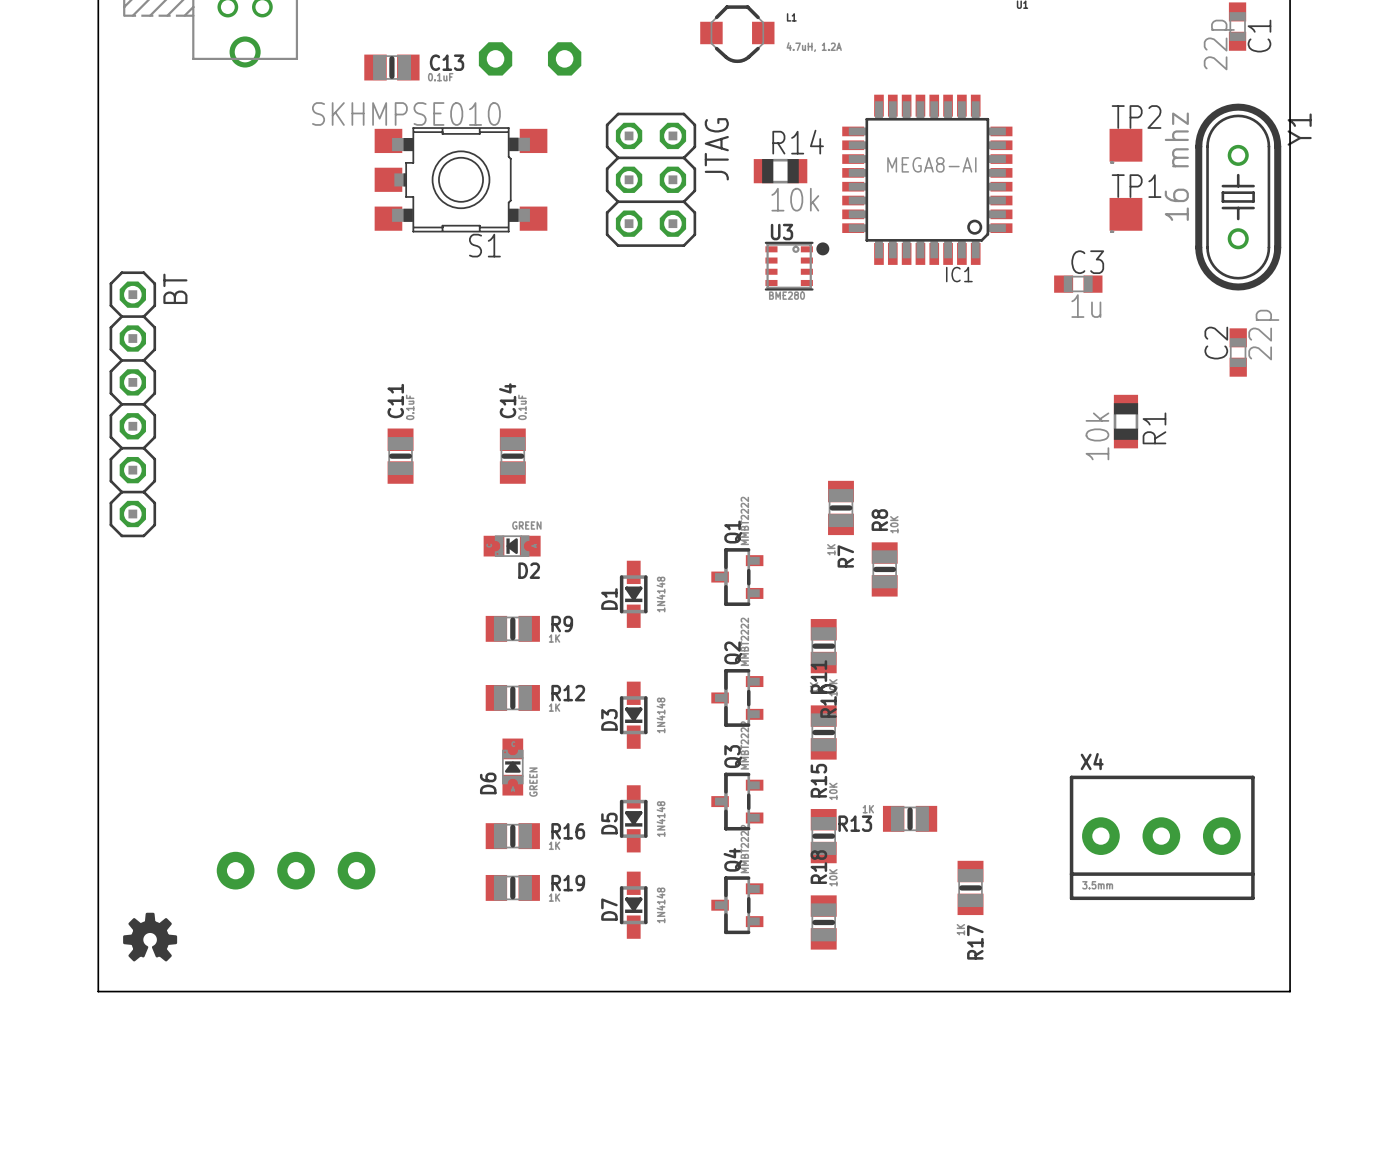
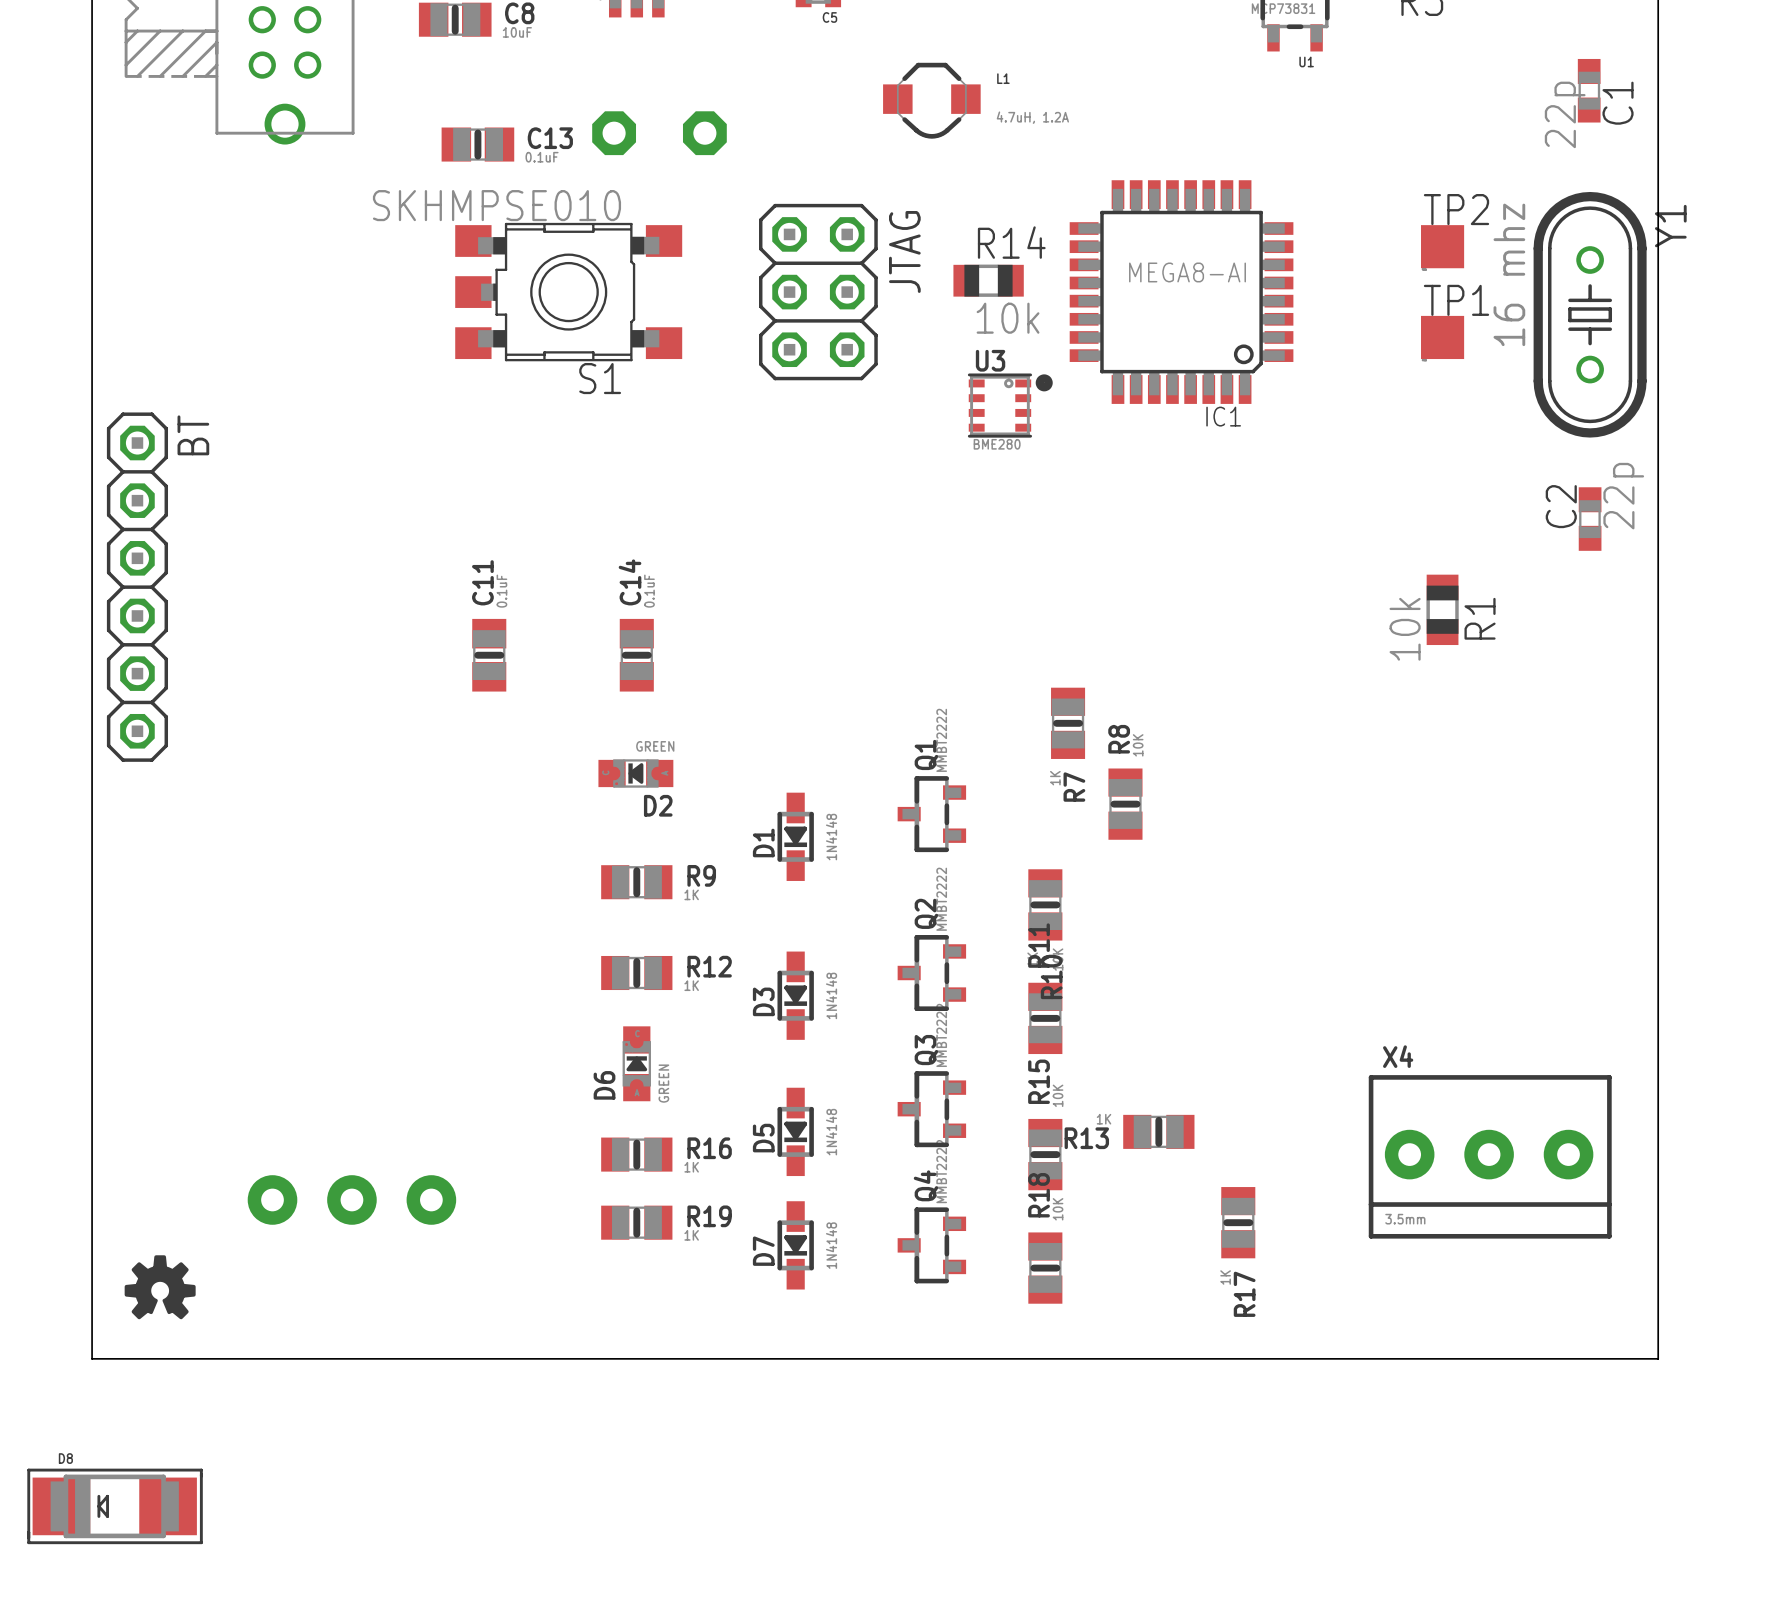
C3: 1u (1078, 284) -> none
D8: none -> (115, 1506)

